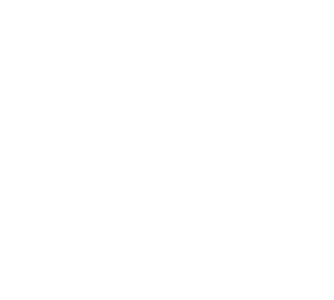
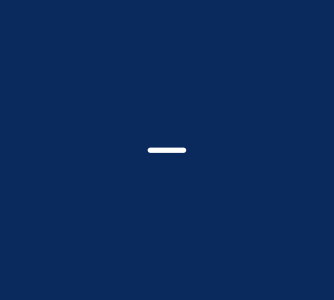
line: none -> (150, 150) (183, 150)

